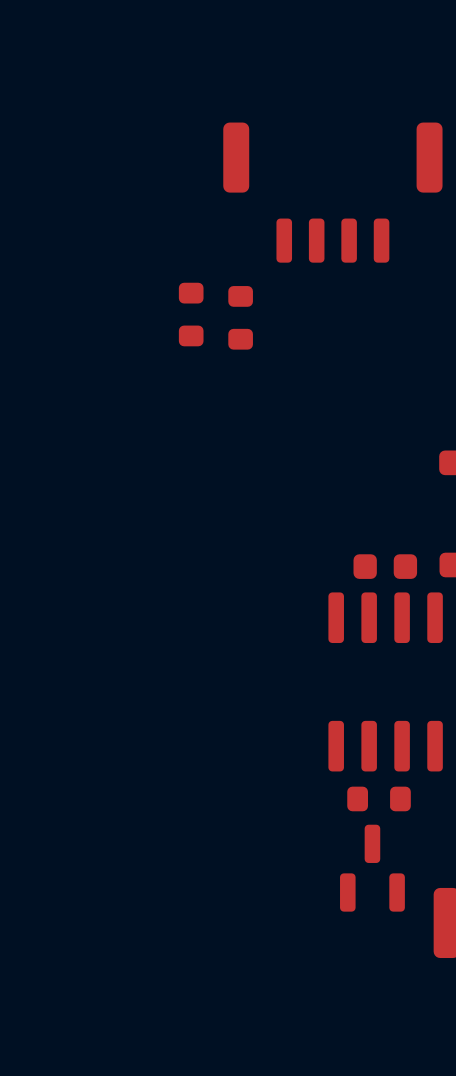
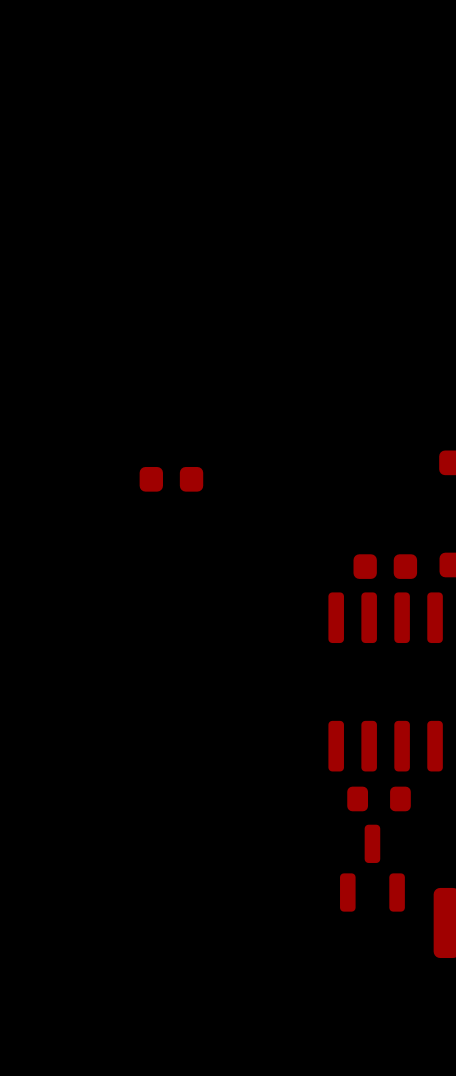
part: (332, 192) -> none
part: (191, 314) -> none
part: (240, 317) -> none
part: none -> (171, 479)

